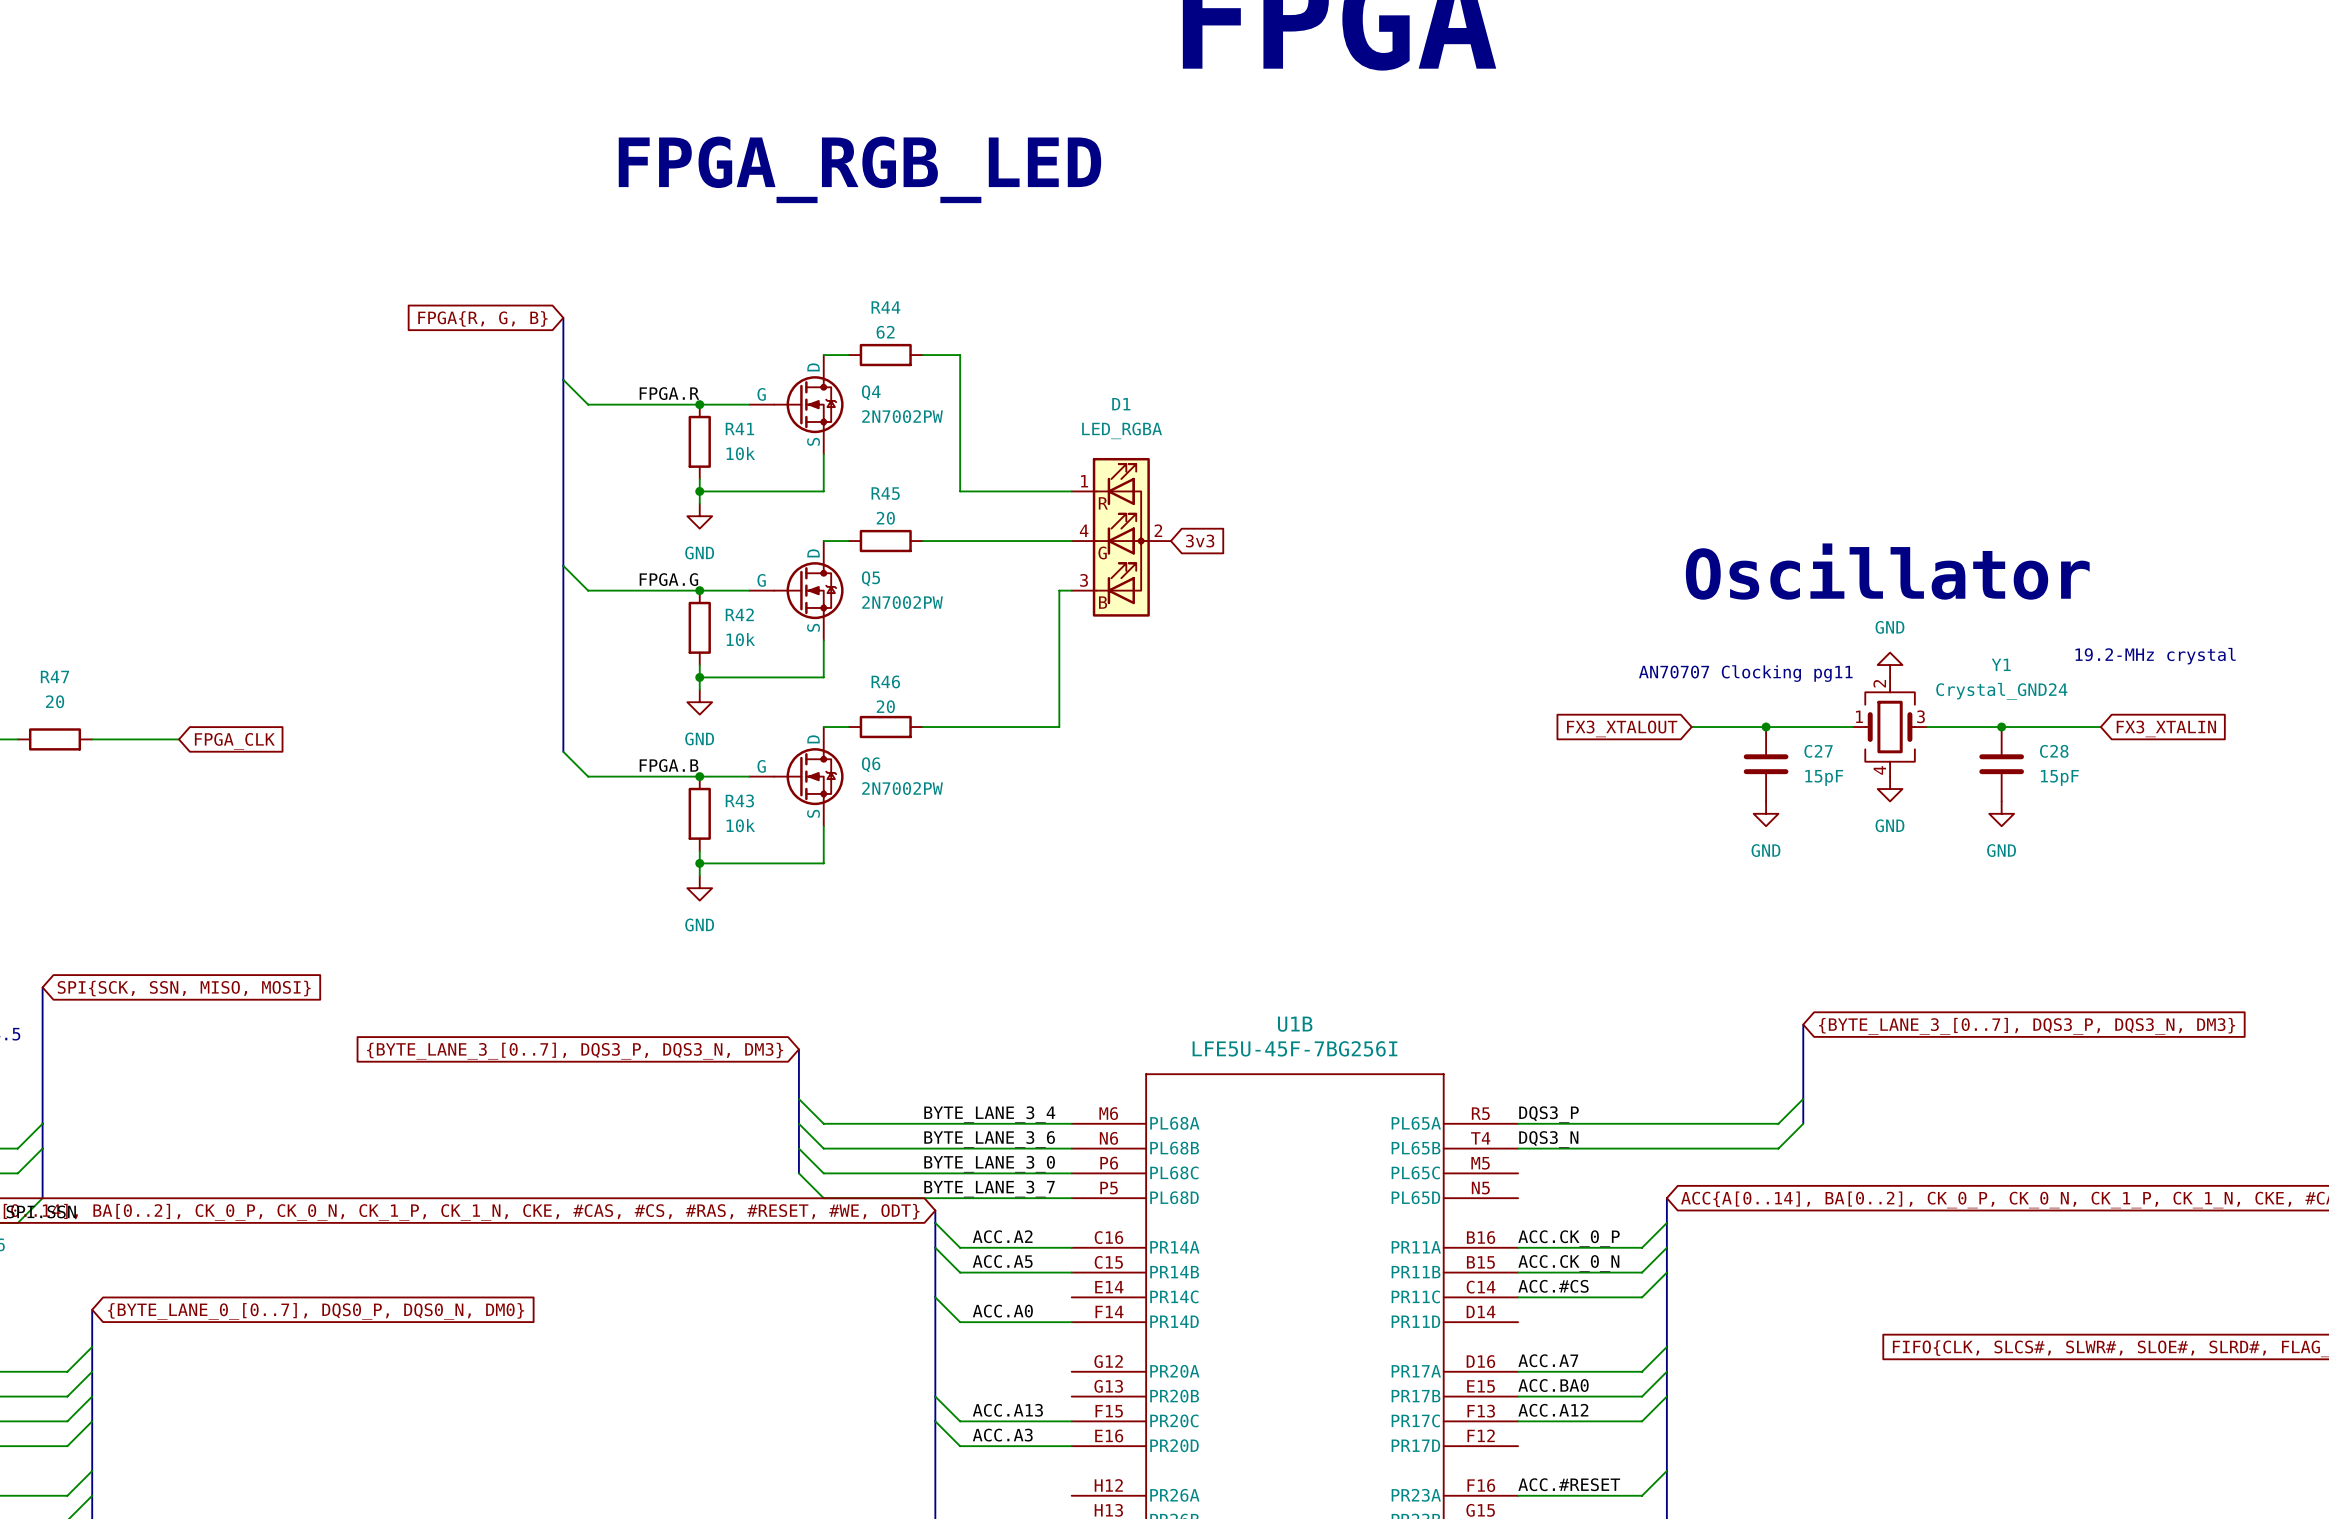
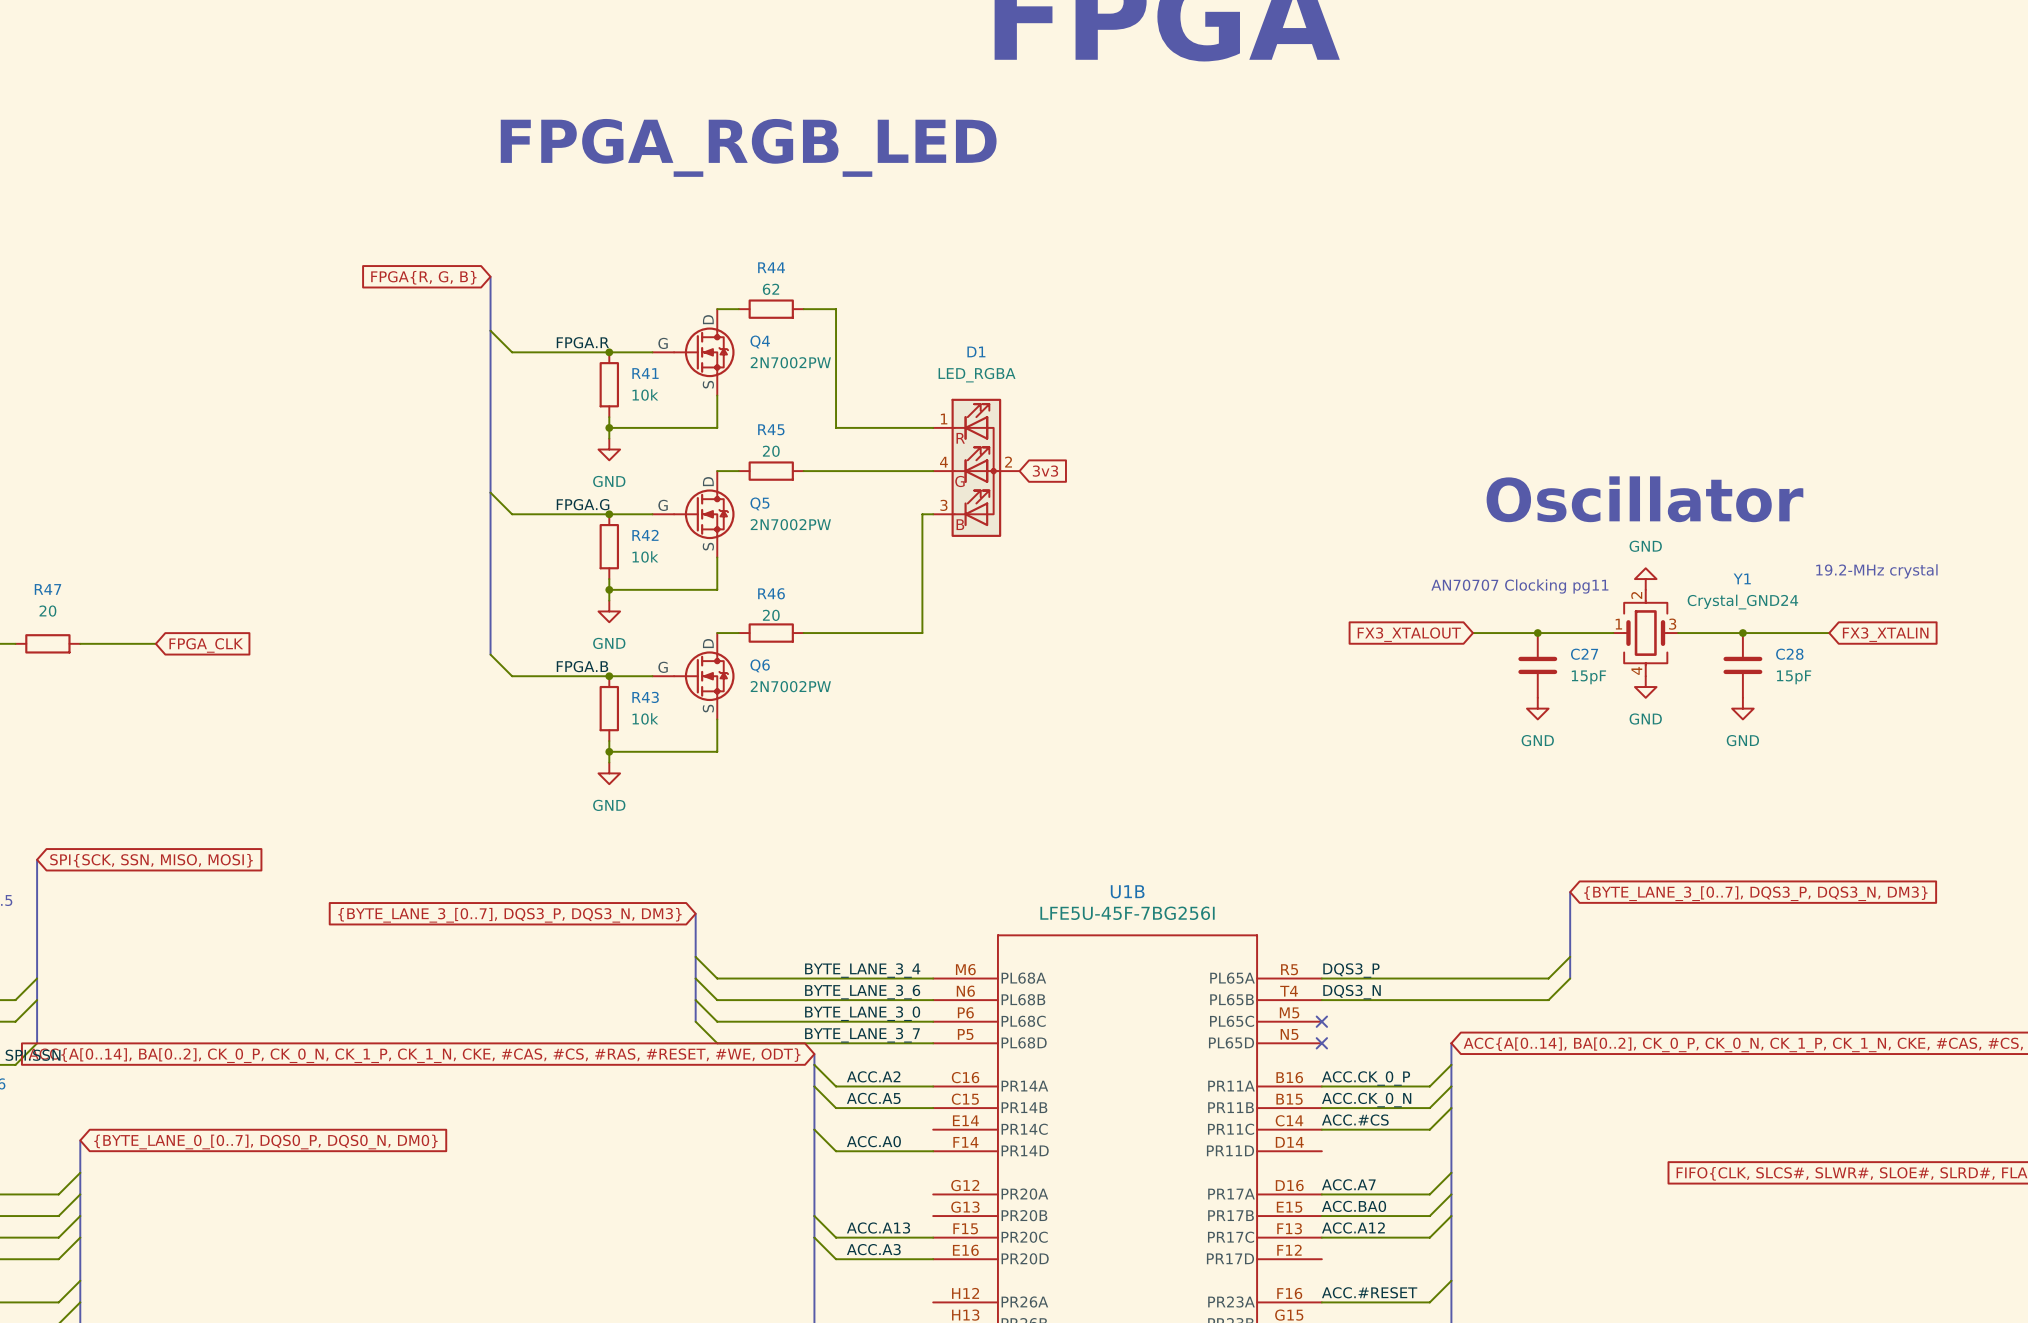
no-connect mark: none -> (1321, 1021)
no-connect mark: none -> (1321, 1043)

